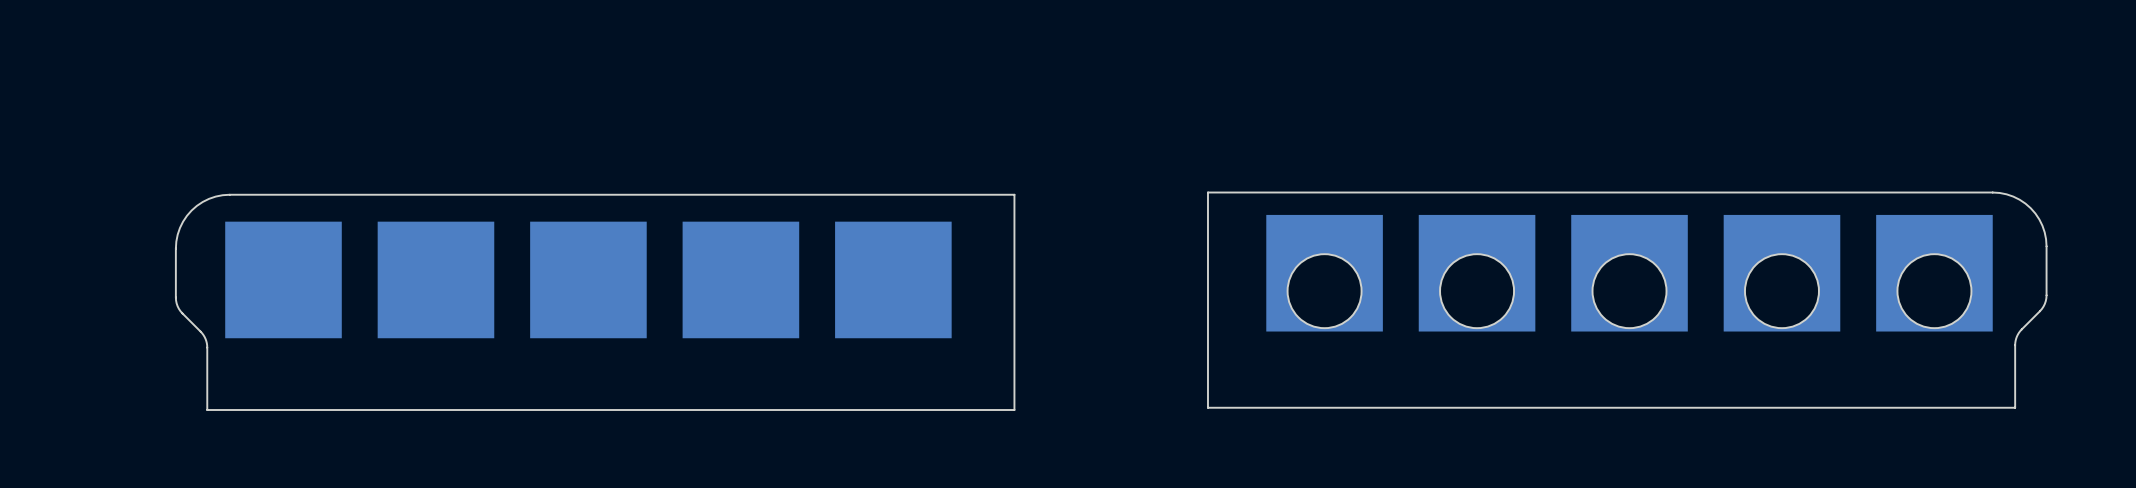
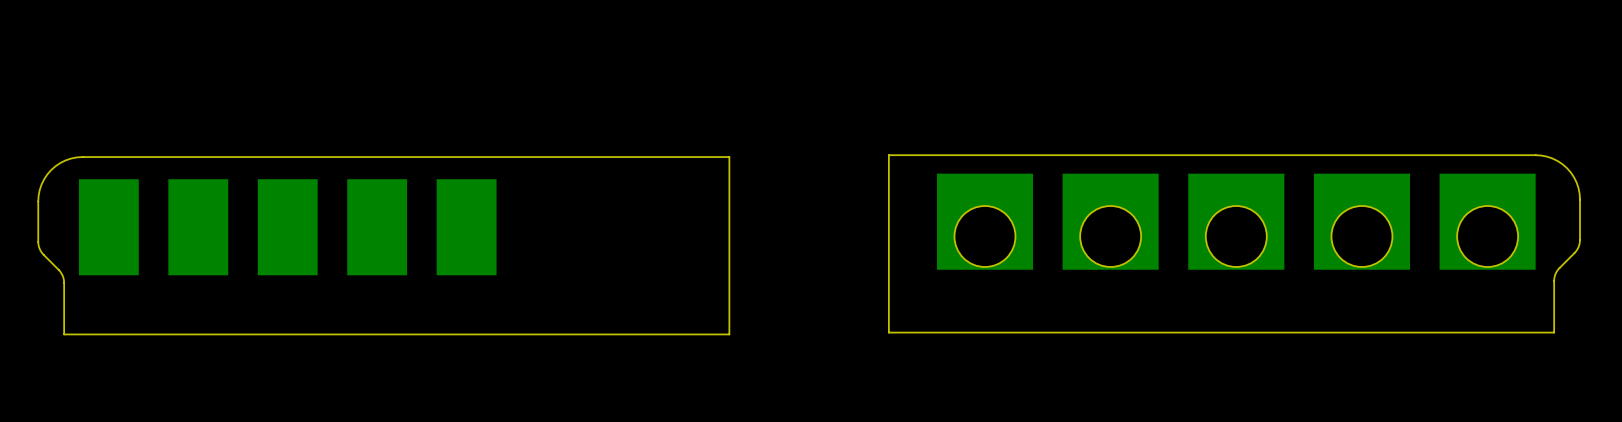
part footprint: [225, 221, 342, 339] -> [78, 179, 139, 276]
part footprint: [530, 221, 647, 339] -> [347, 179, 408, 276]
part: none -> (198, 227)
part: (435, 279) -> none
part: none -> (287, 227)
part: none -> (466, 227)
part: (740, 279) -> none
part: (893, 279) -> none

